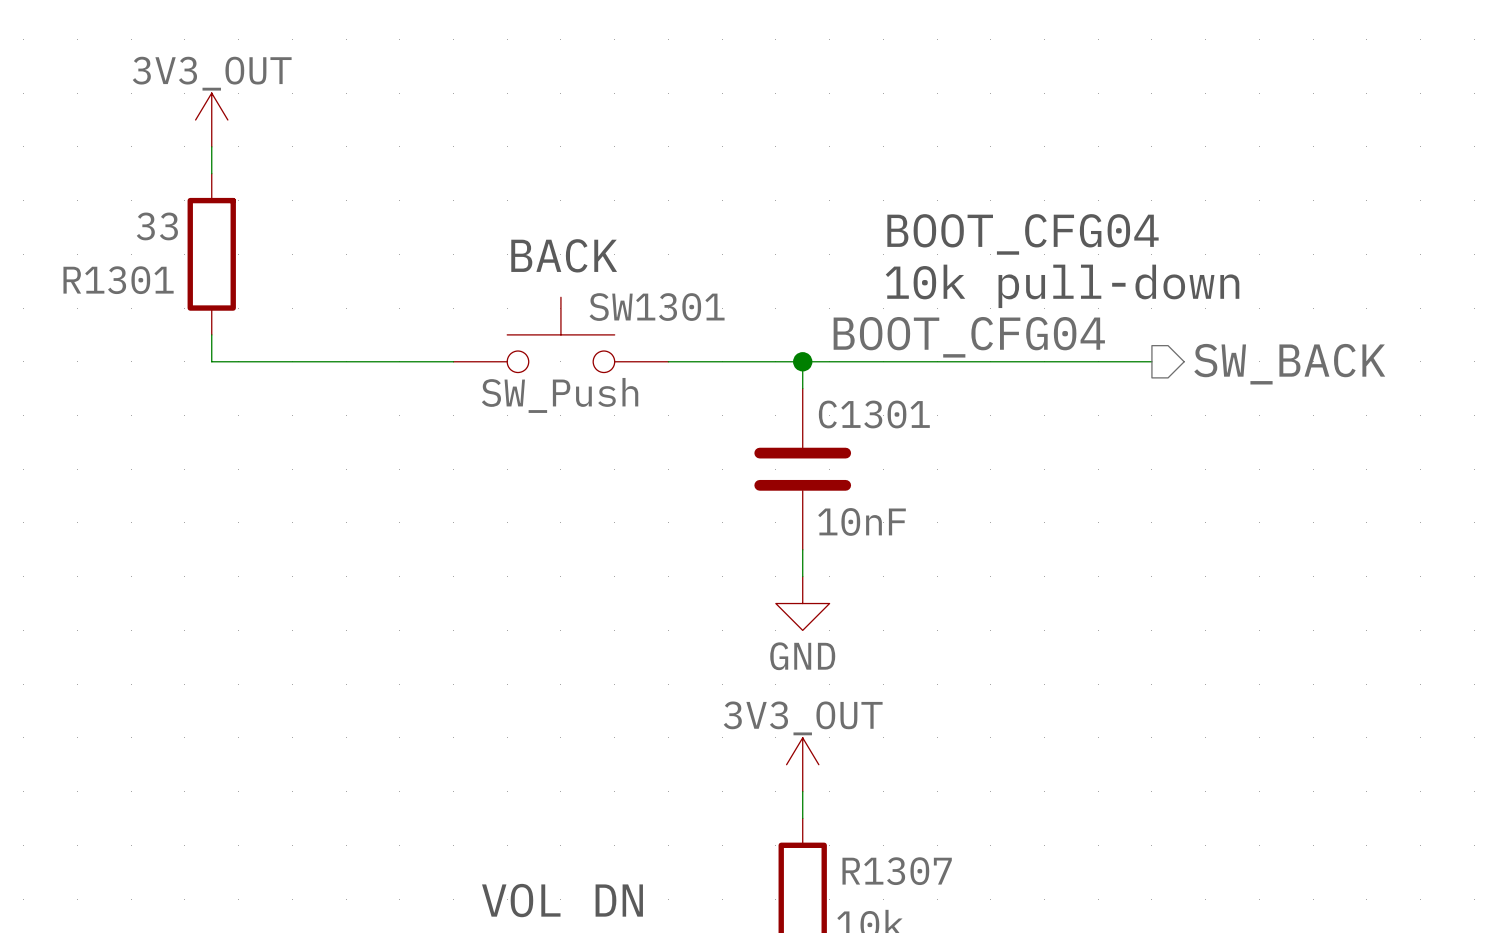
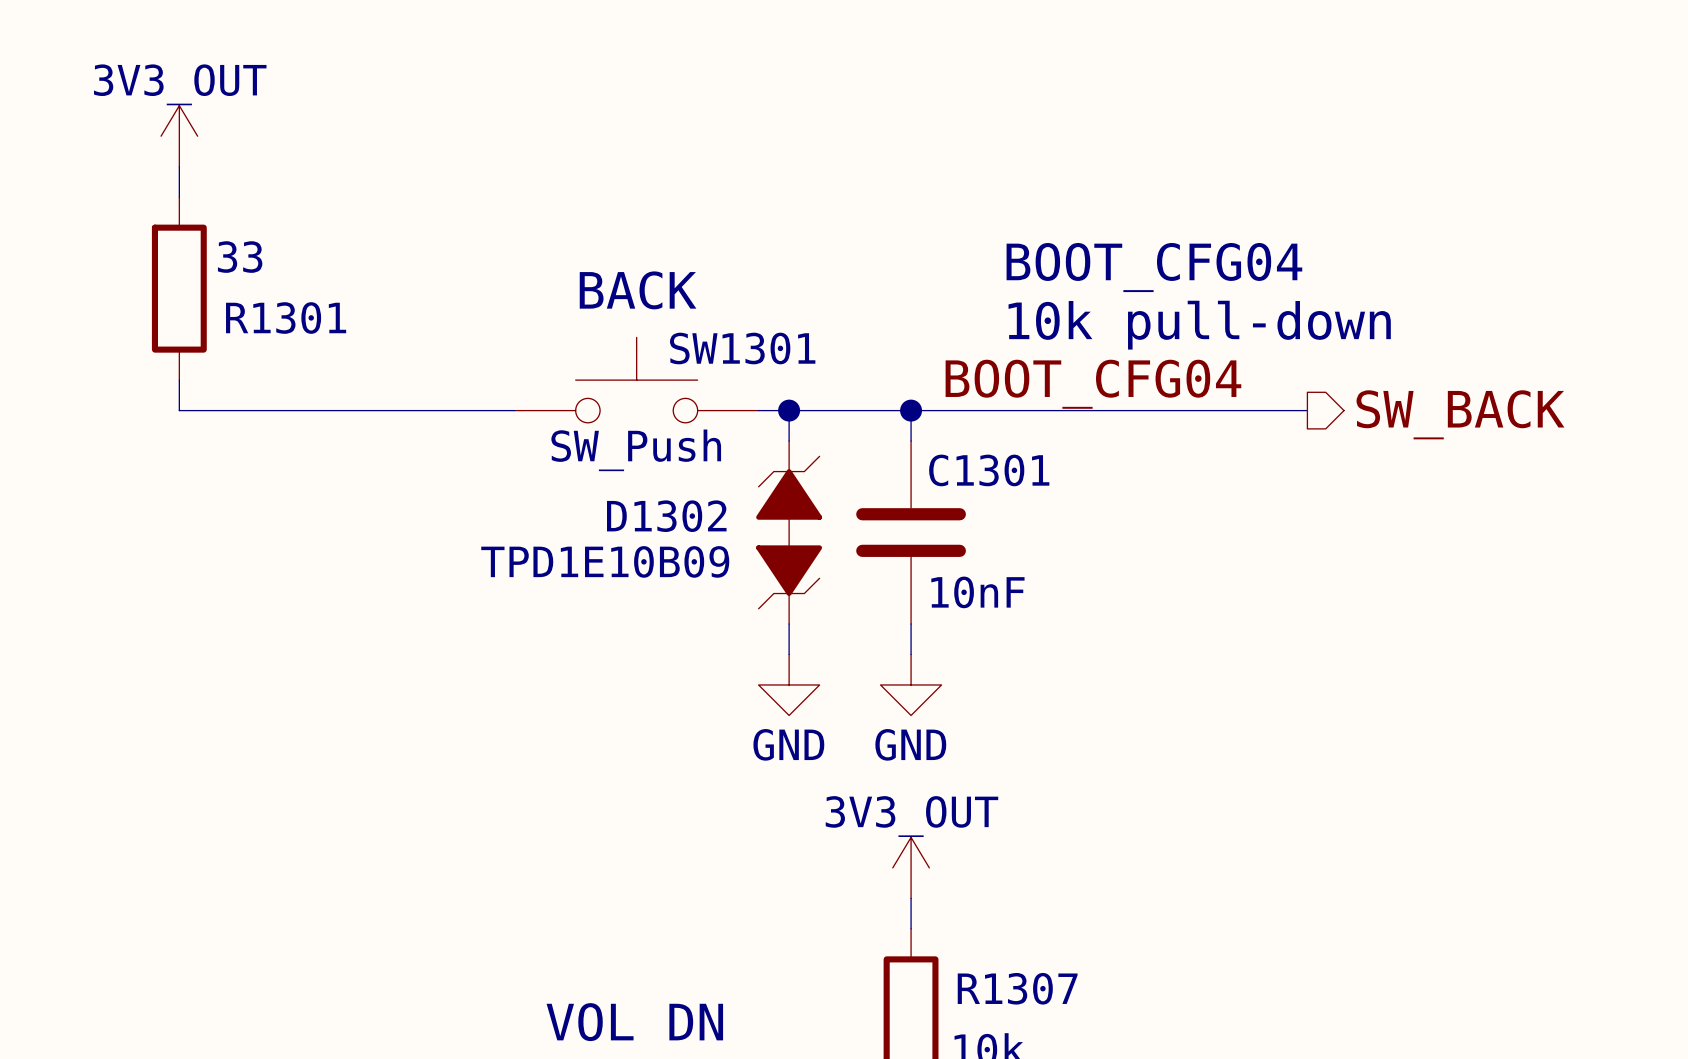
power symbol position: 3V3_OUT (211, 120) -> 3V3_OUT (179, 136)
wire: (211, 146) (211, 173) -> (179, 166) (179, 197)
R1301 value position: 33 (157, 226) -> 33 (240, 257)
R1301 position: (211, 254) -> (179, 288)
R1301 name position: R1301 (118, 280) -> R1301 (286, 318)
wire: (211, 334) (211, 361) -> (179, 380) (179, 410) (240, 410)
wire: none -> (789, 410) (789, 441)
junction: none -> (789, 410)
D1302: none -> TPD1E10B09 (789, 532)
wire: none -> (789, 624) (789, 654)
power symbol: none -> GND (789, 684)

